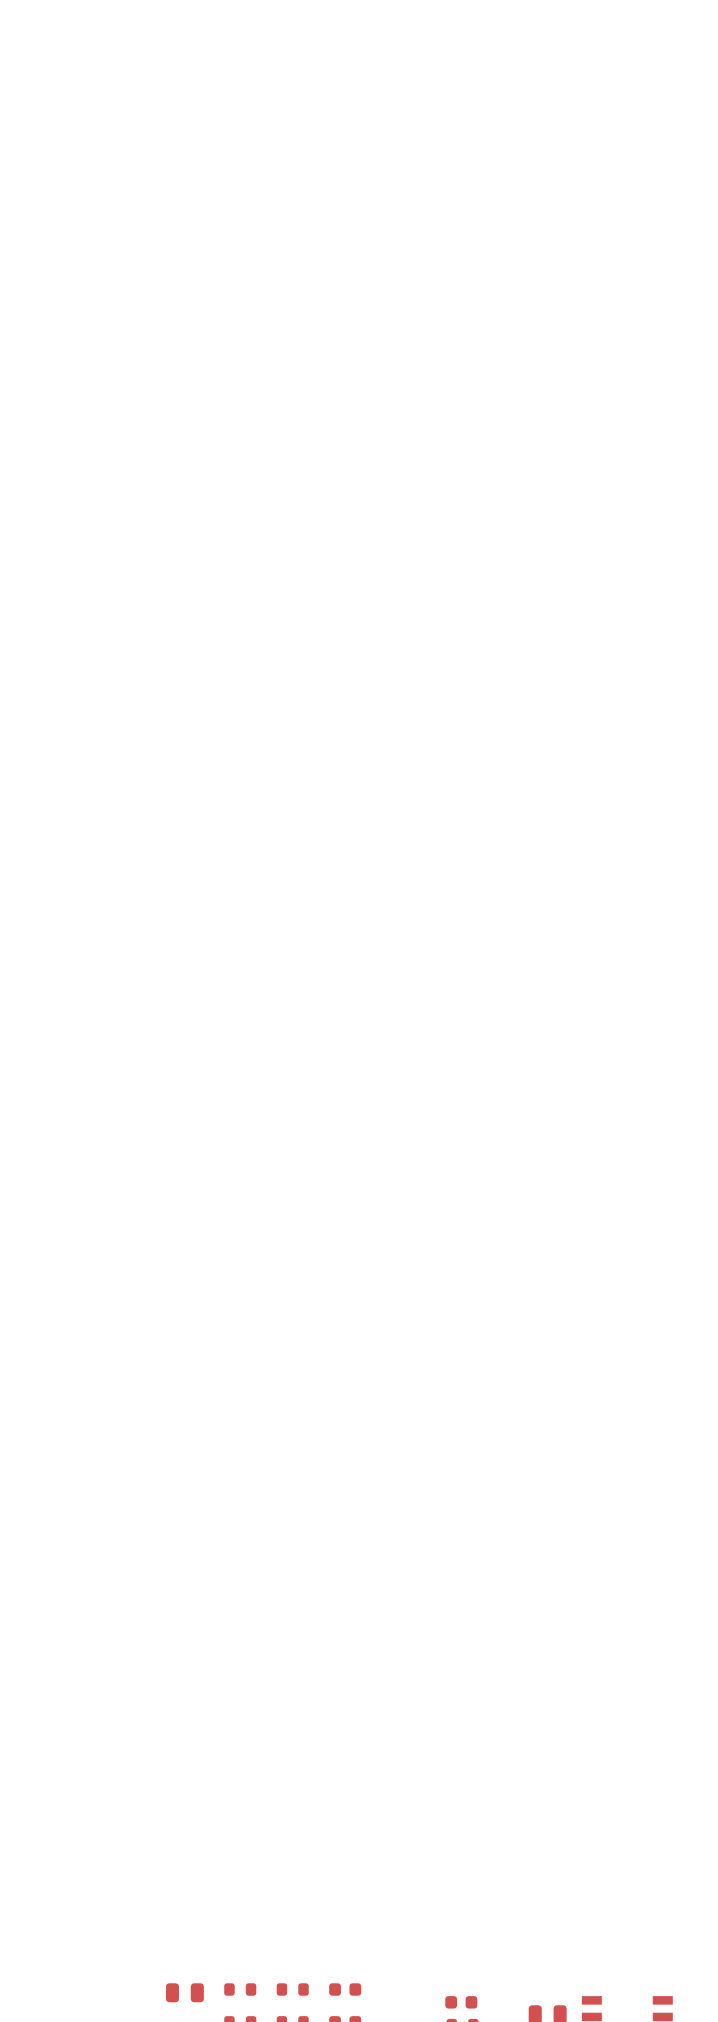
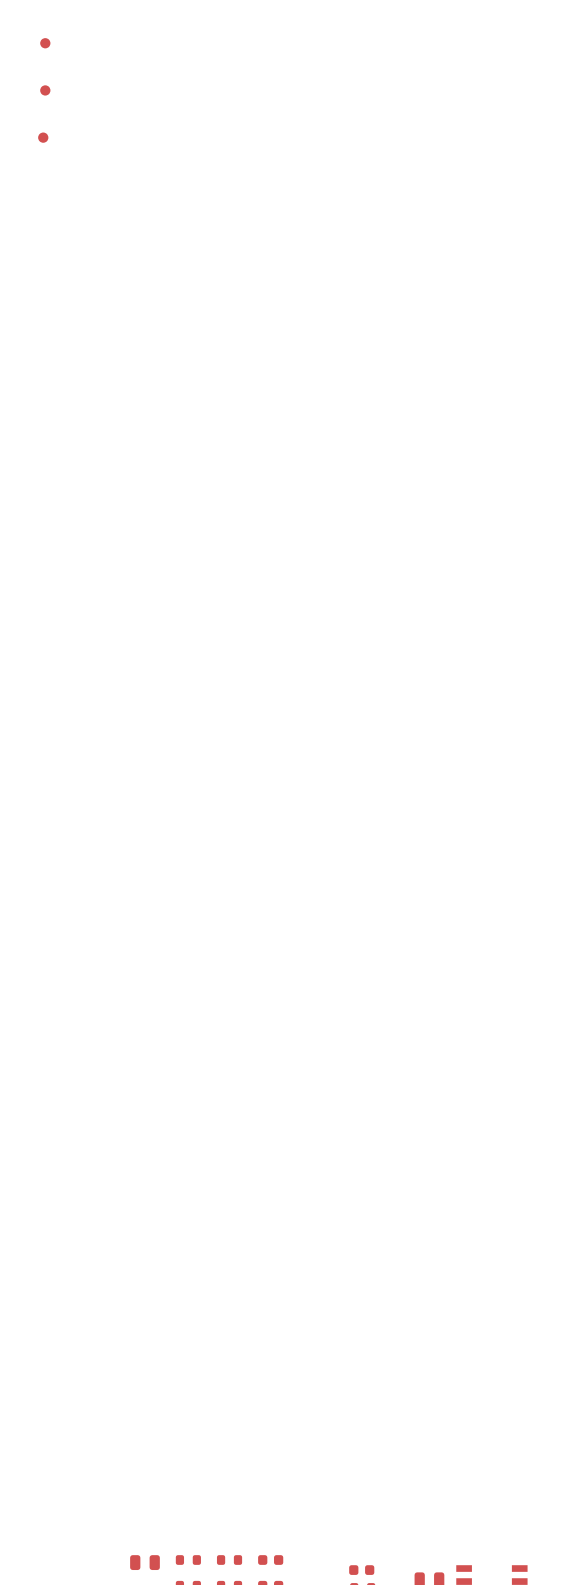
part: none -> (45, 43)
part: none -> (45, 90)
part: none -> (43, 137)

